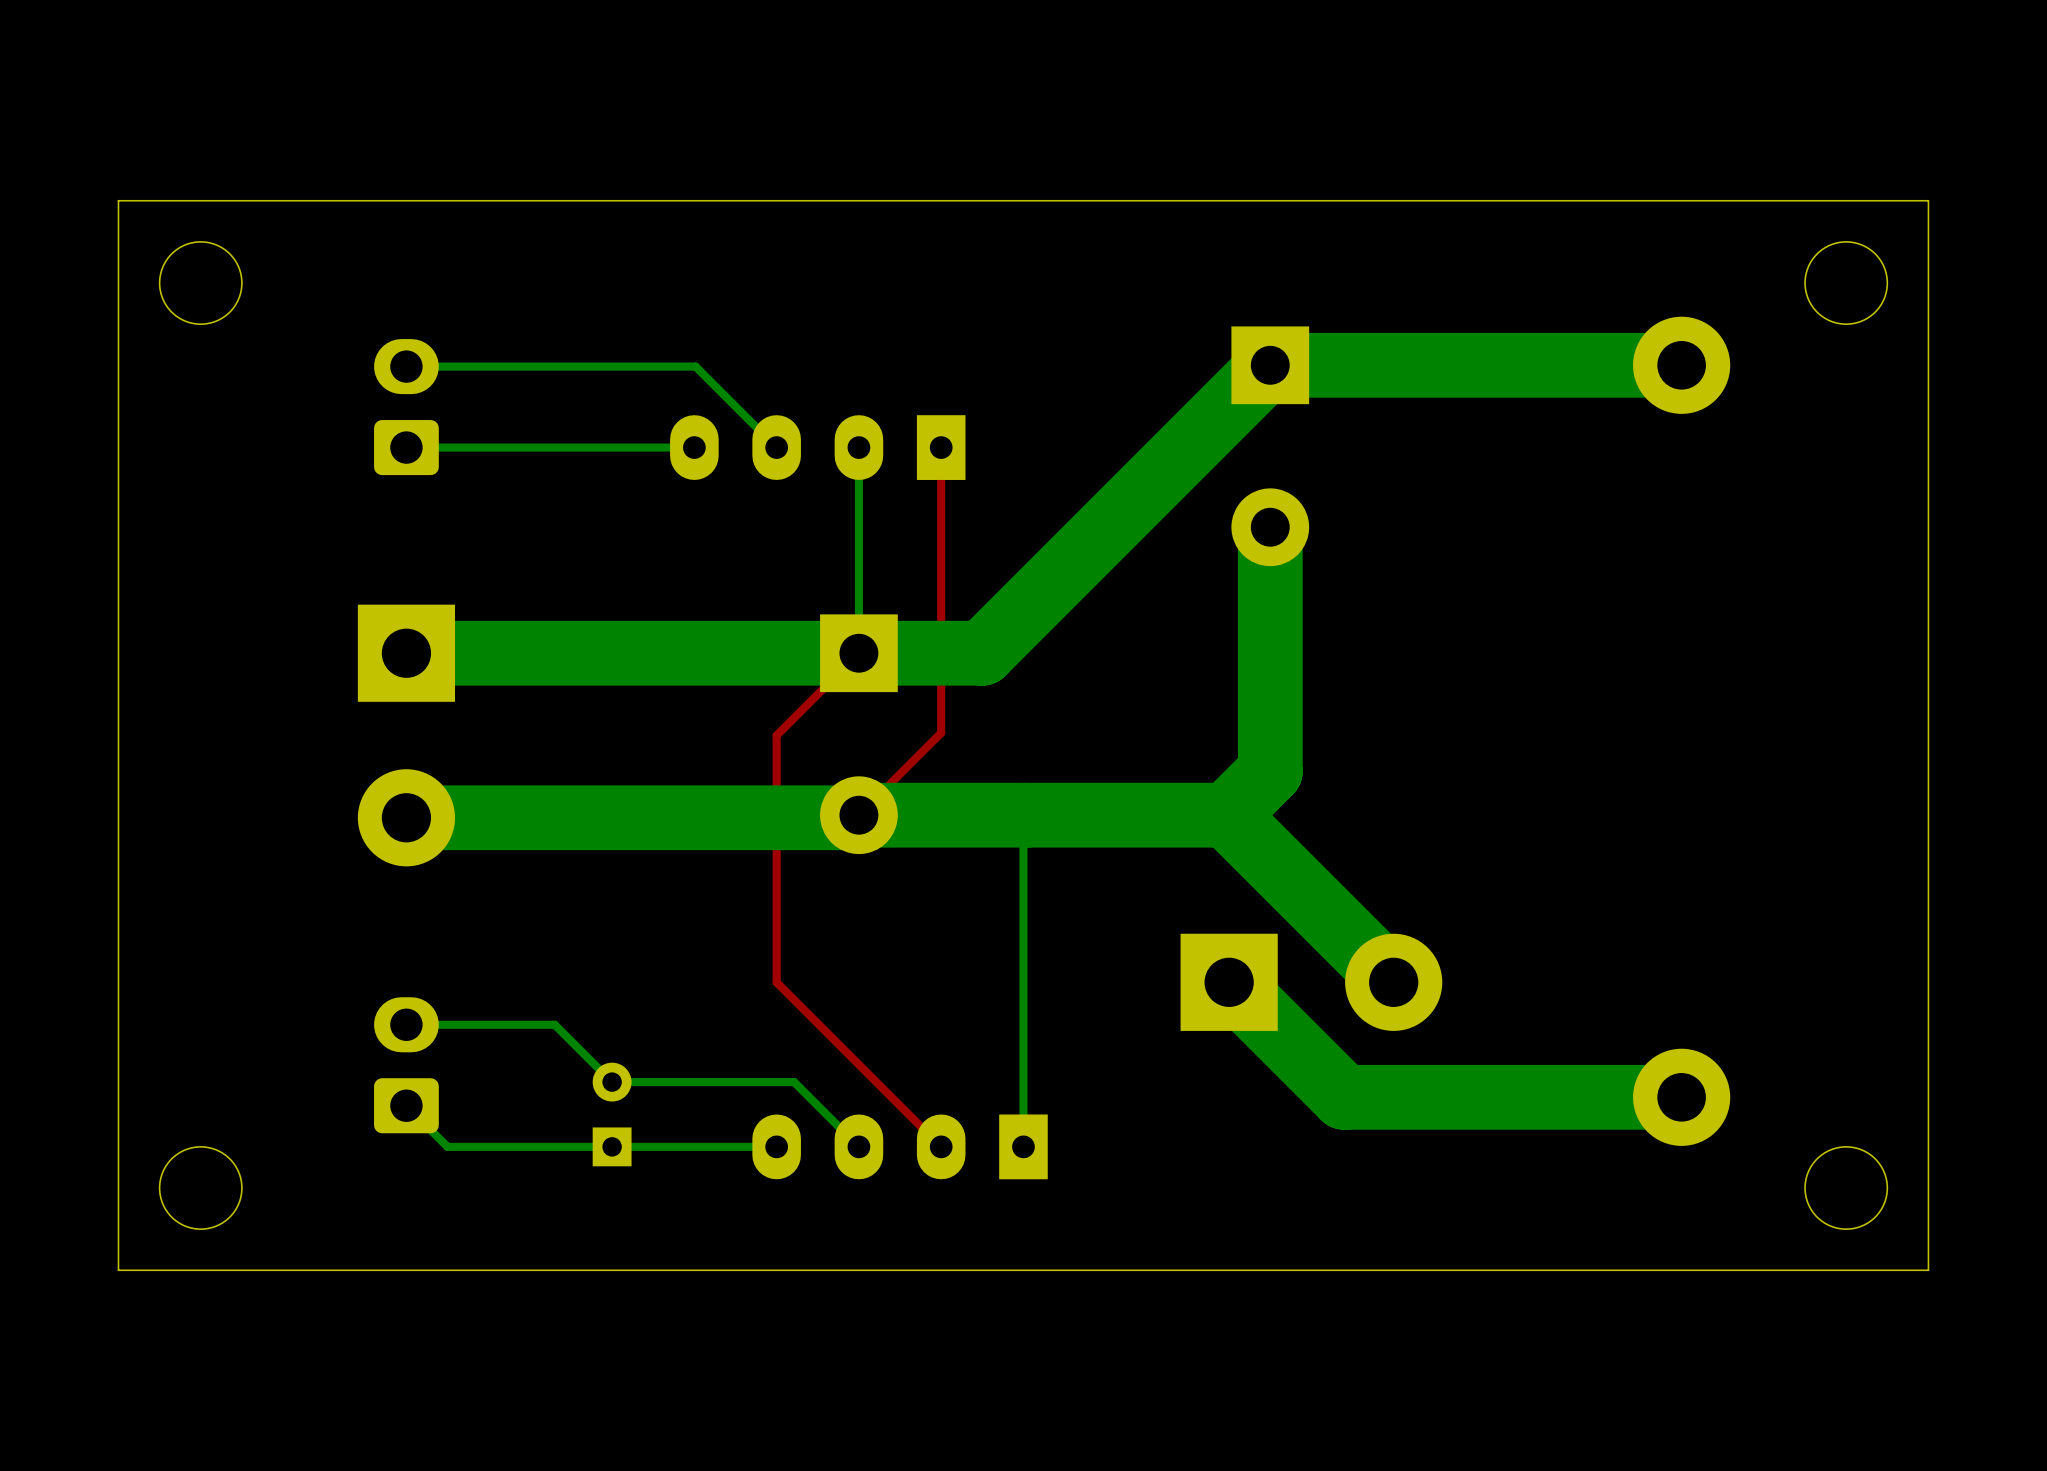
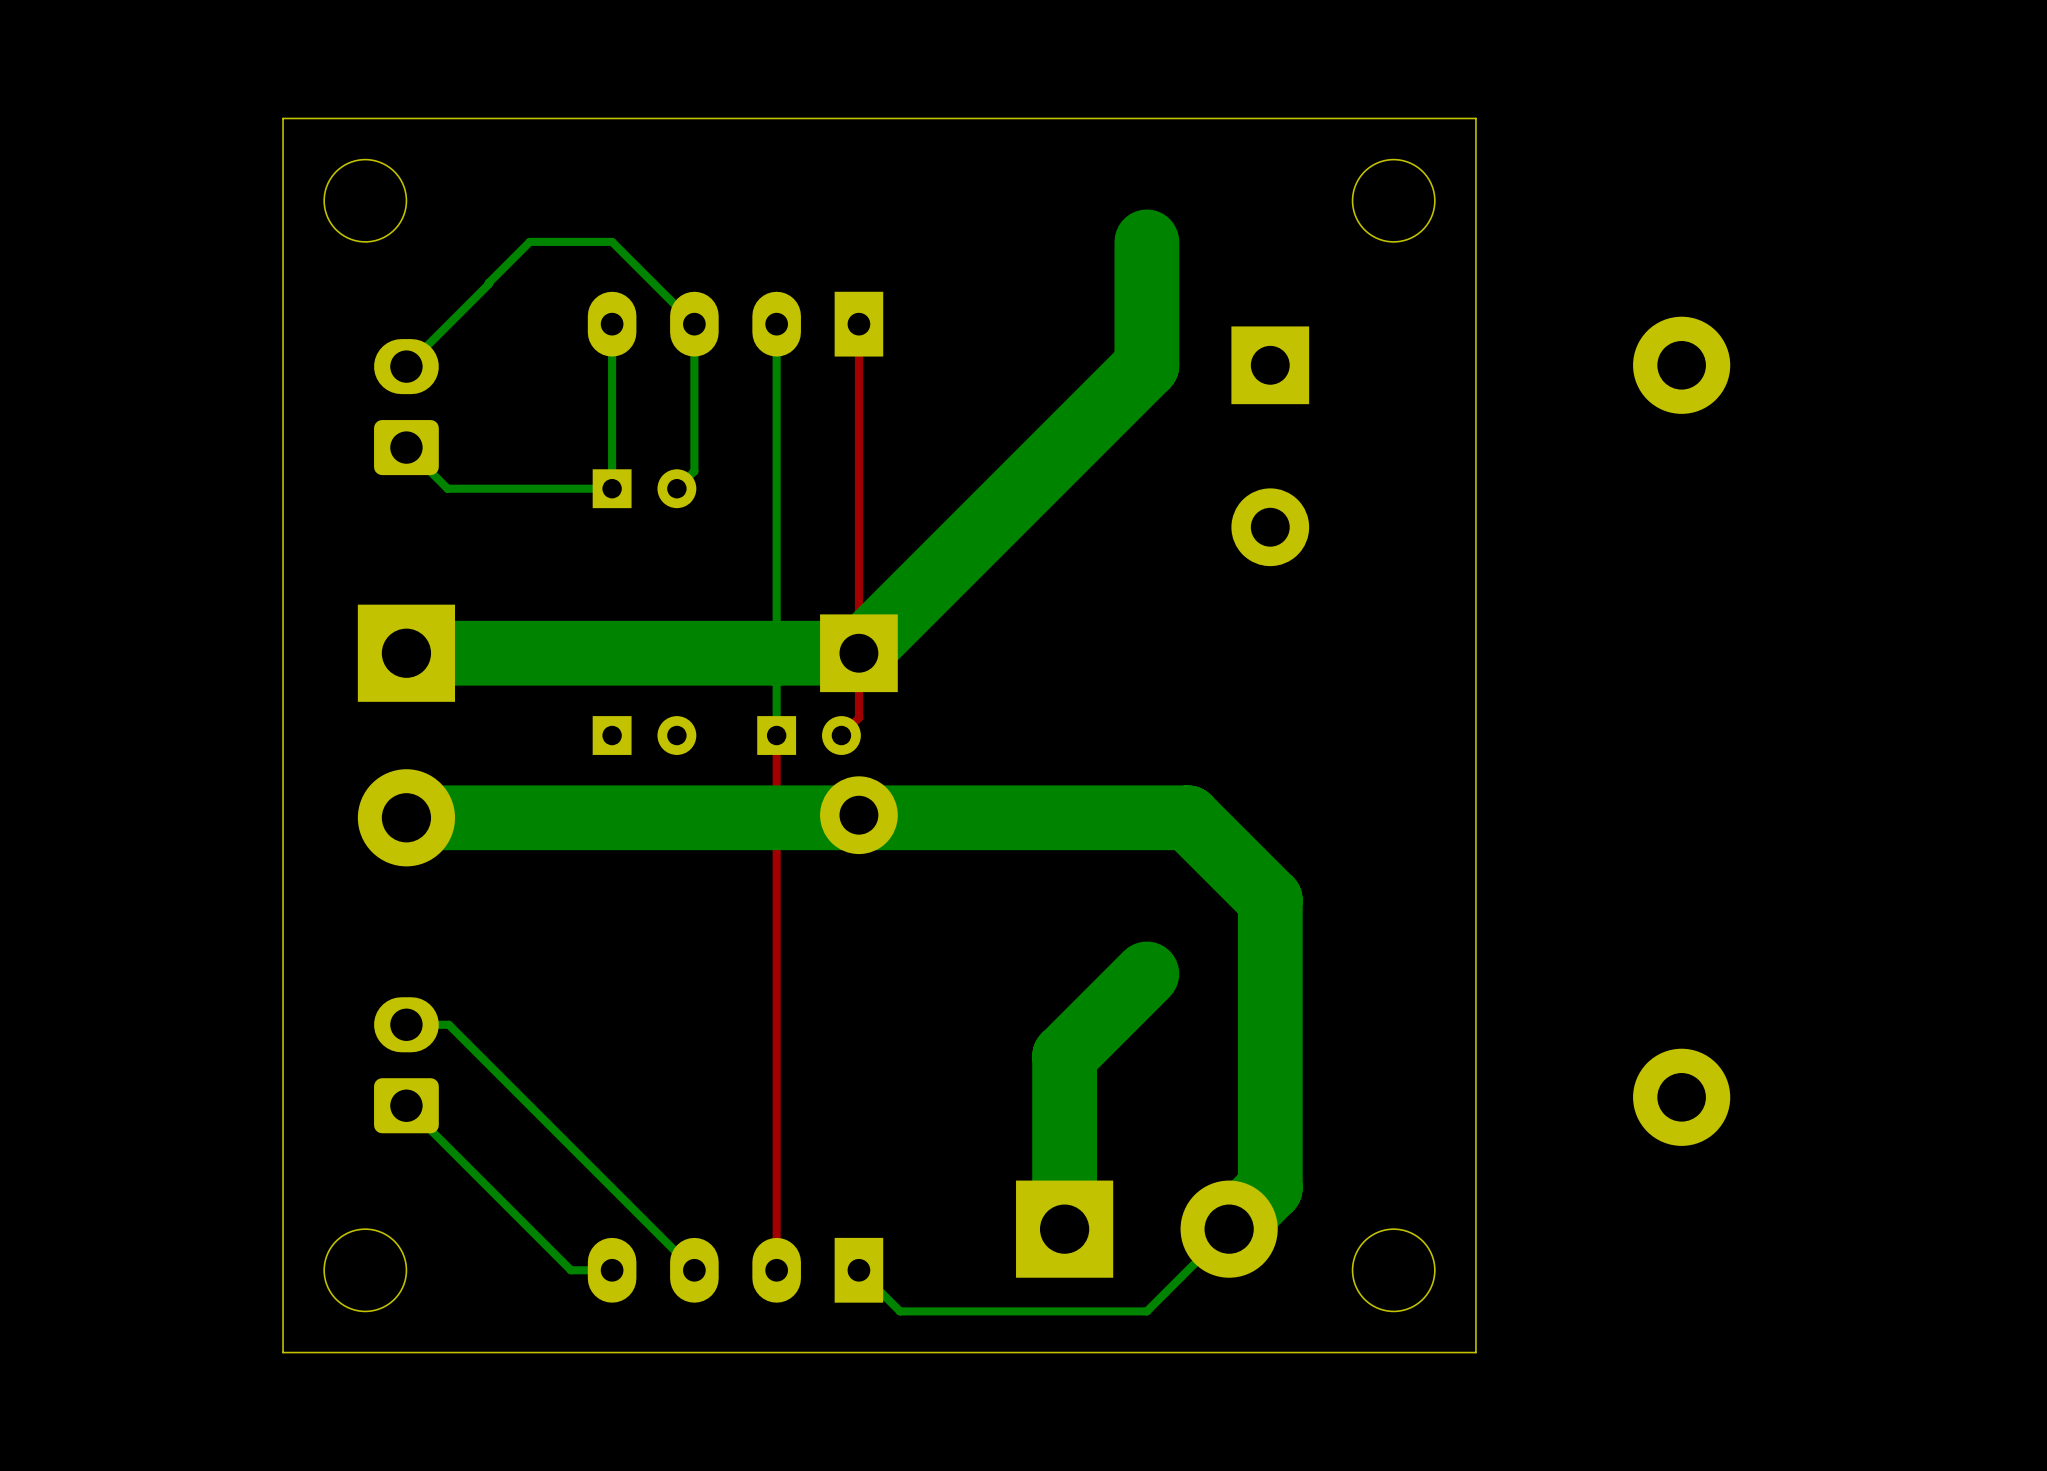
board edge: (1928, 200) (1928, 1270) (118, 1270) (118, 200) (1928, 200) -> (1475, 118) (1475, 1352) (283, 1352) (283, 118) (1475, 118)
bottom track: none -> (1146, 241) (1146, 365) (858, 653)
round board edge position: (200, 283) -> (365, 200)
round board edge position: (1846, 283) -> (1393, 200)
bottom track: none -> (776, 324) (776, 735)
top track: none -> (858, 324) (858, 718) (841, 735)
bottom track: (1681, 365) (1270, 365) (982, 653) (858, 653) (858, 447) -> none
bottom track: (406, 366) (695, 366) (776, 447) -> (406, 366) (529, 241) (612, 241) (694, 324) (694, 471) (676, 488)
bottom track: (694, 447) (406, 447) -> (612, 324) (612, 488) (447, 488) (406, 447)
part position: (817, 447) -> (735, 324)
top track: (941, 447) (941, 732) (858, 815) -> none
part: none -> (644, 488)
bottom track: (1270, 527) (1270, 771) (1226, 815) -> none
top track: (858, 653) (776, 735) -> none
part: none -> (644, 735)
part: none -> (809, 735)
bottom track: (1026, 815) (1023, 817) (1023, 1146) -> none
bottom track: (1226, 815) (858, 815) (856, 817) -> (858, 1270) (900, 1311) (1146, 1311) (1270, 1188) (1270, 900) (1188, 817) (856, 817)
bottom track: (1226, 815) (1393, 982) -> none
bottom track: none -> (1146, 973) (1064, 1056) (1064, 1229)
top track: (776, 982) (941, 1146) -> (776, 982) (776, 1270)
bottom track: (1229, 982) (1344, 1097) (1681, 1097) -> none
part position: (1311, 982) -> (1146, 1229)
bottom track: (448, 1024) (554, 1024) (612, 1082) (794, 1082) (858, 1146) -> (448, 1024) (694, 1270)
part: (612, 1114) -> none
bottom track: (776, 1146) (447, 1146) -> (612, 1270) (570, 1270) (447, 1146)
part position: (900, 1146) -> (735, 1270)
round board edge position: (200, 1188) -> (365, 1270)
round board edge position: (1846, 1188) -> (1393, 1270)

